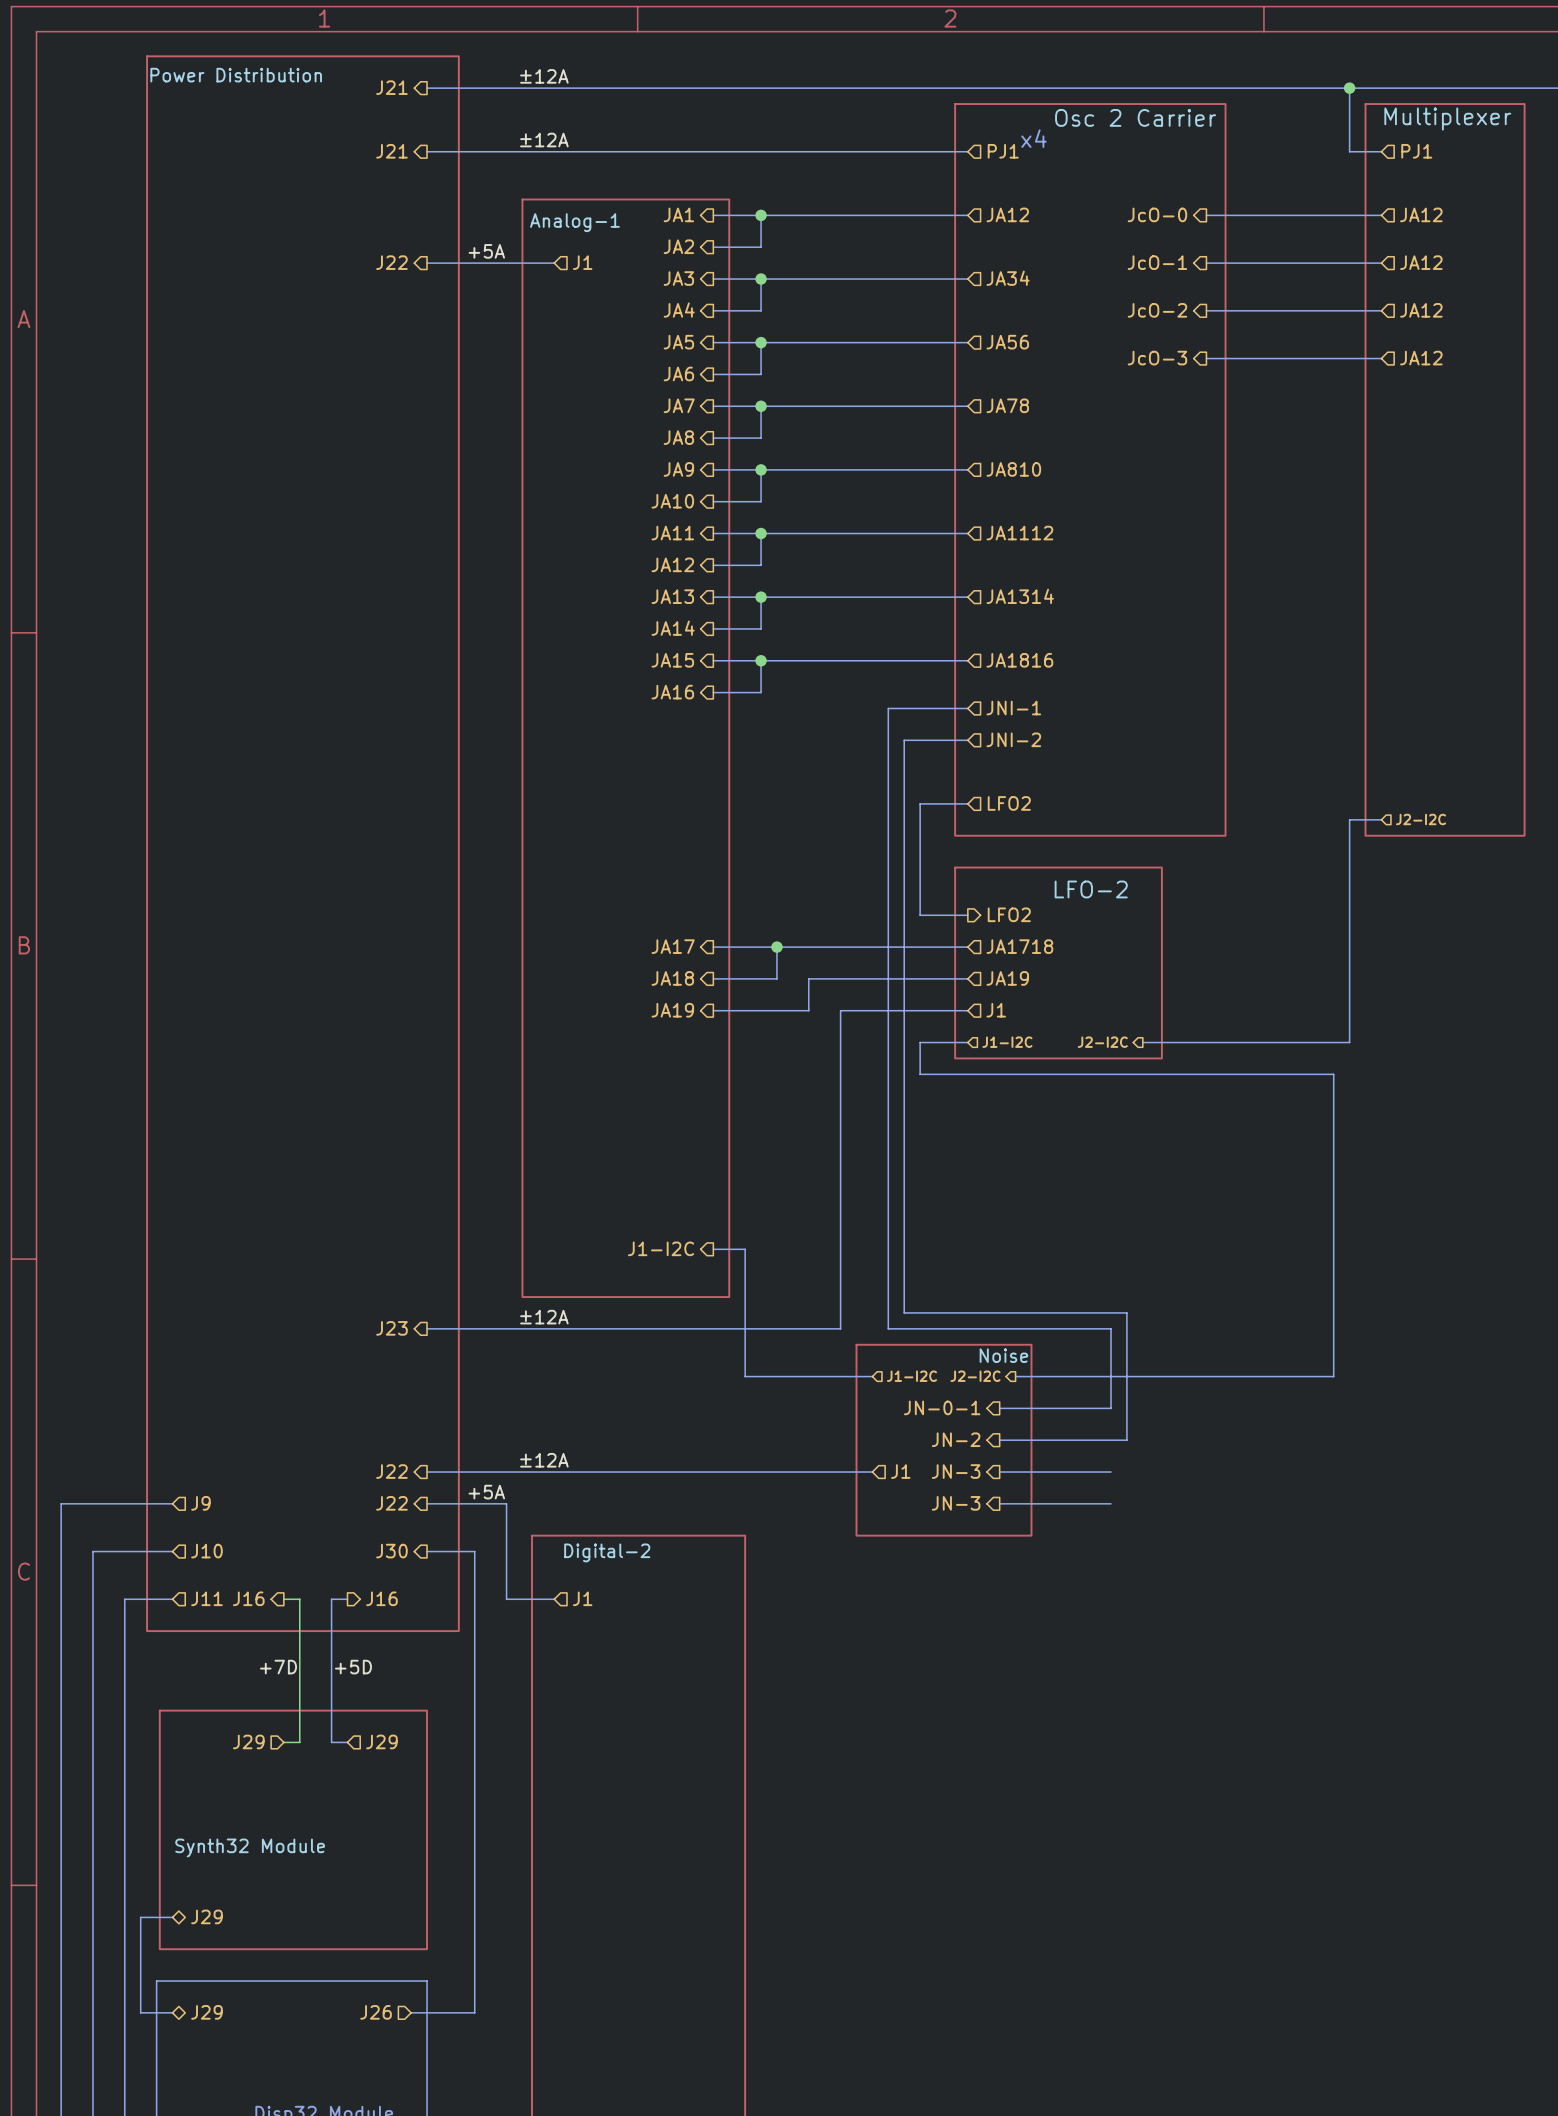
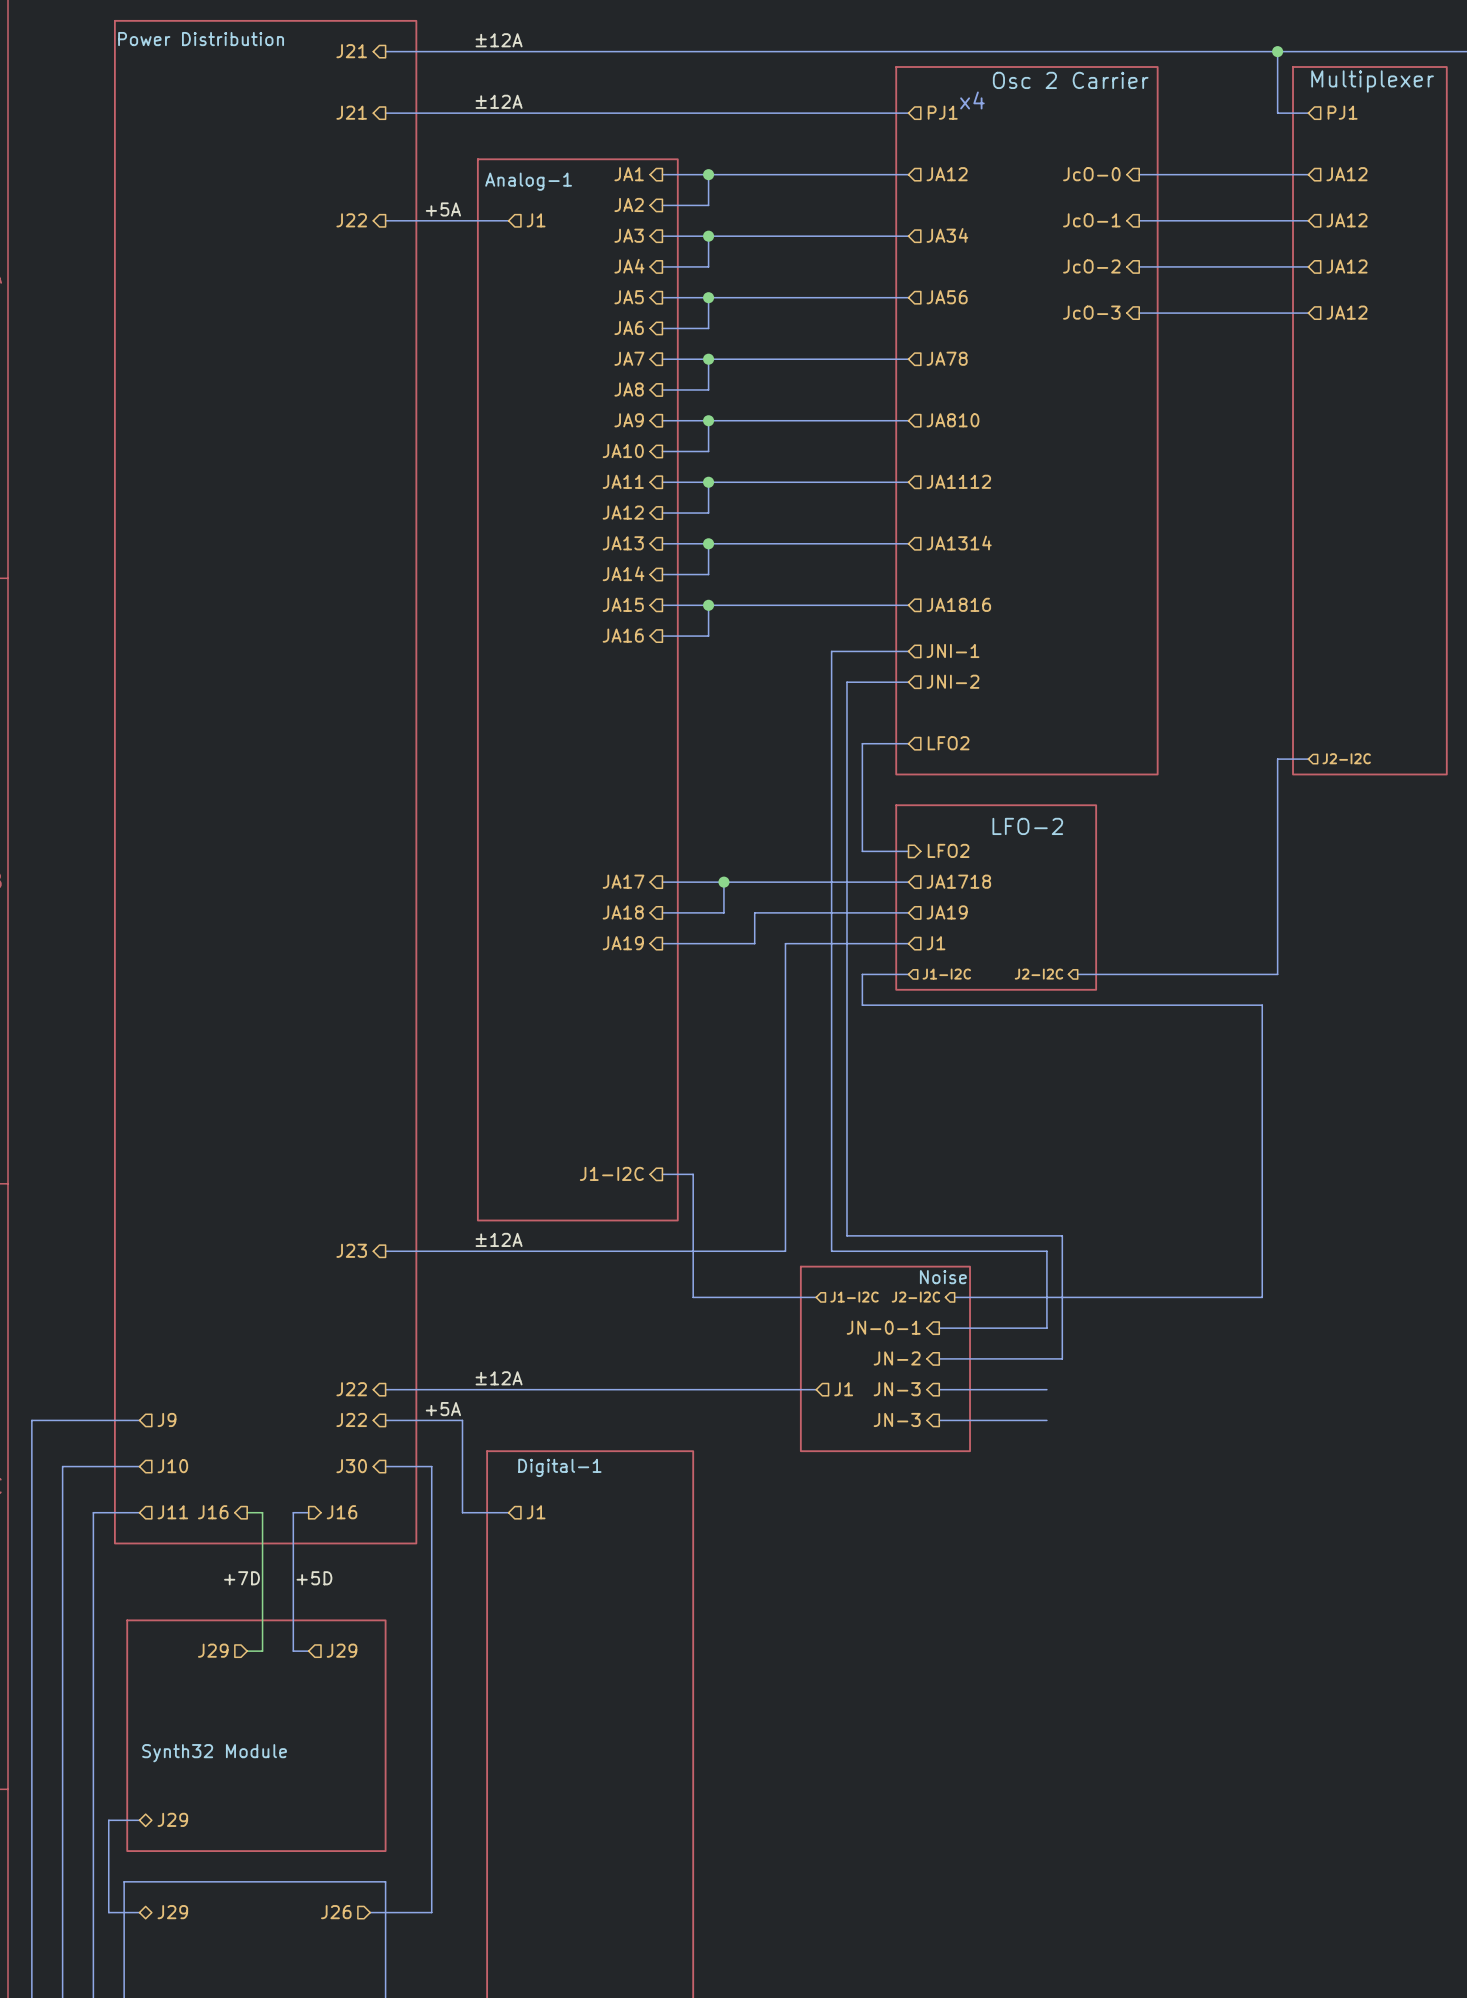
sheet Digital-2 name: Digital-2 (607, 1552) -> Digital-1 (559, 1467)

